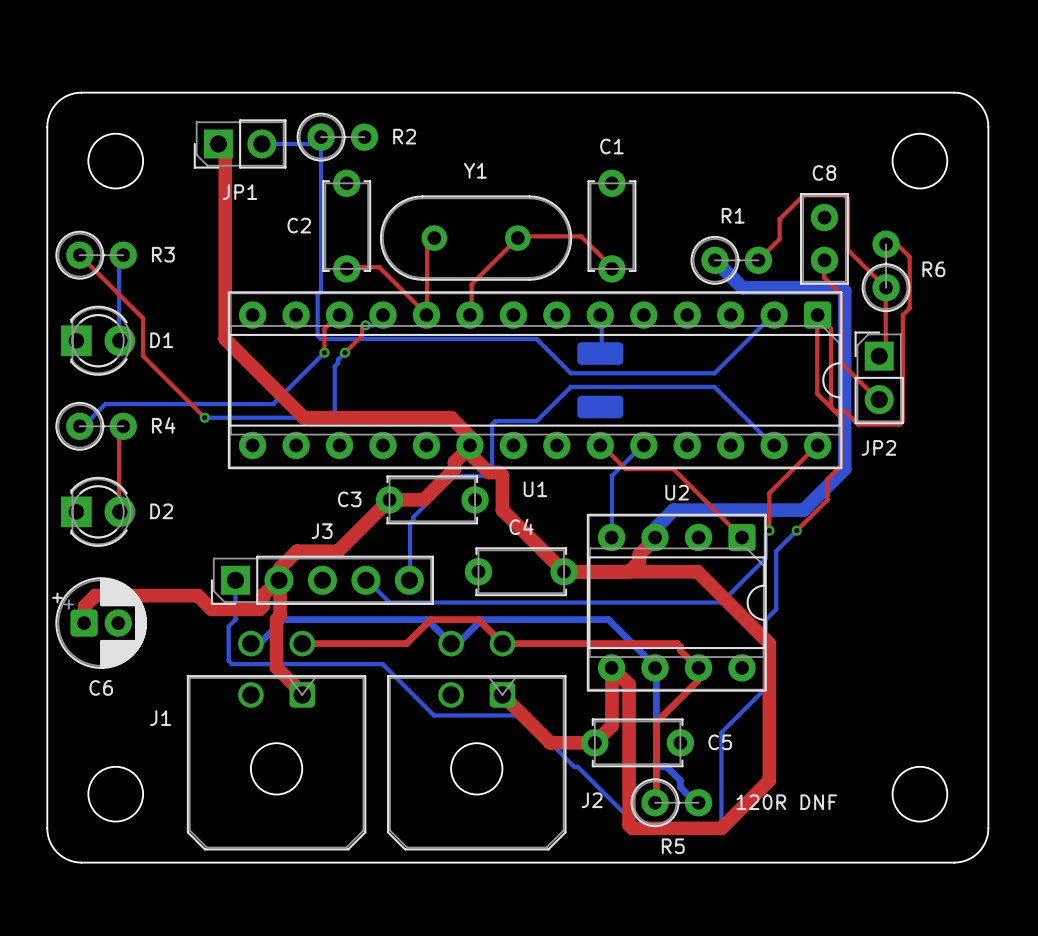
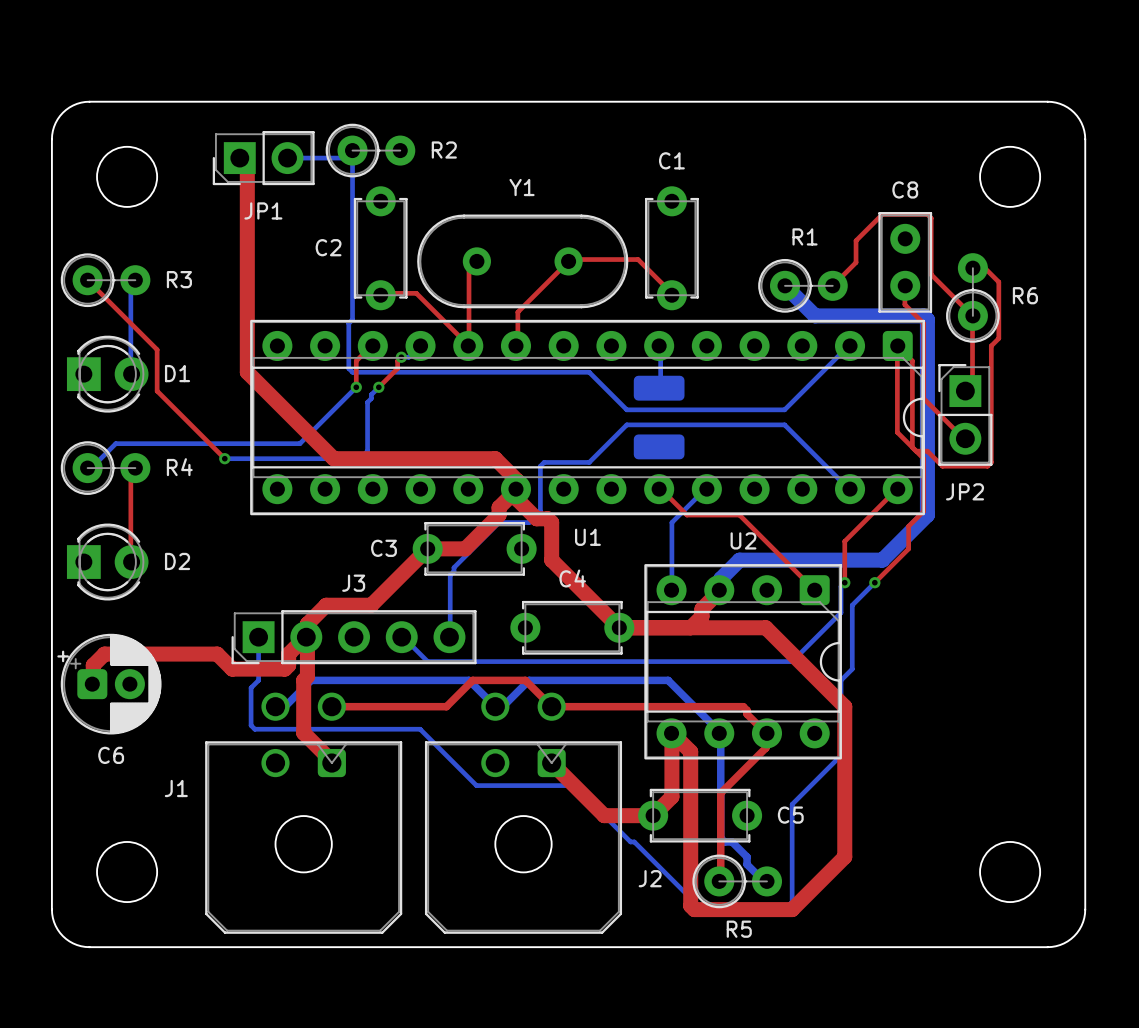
text: 120R DNF (786, 802) -> none

